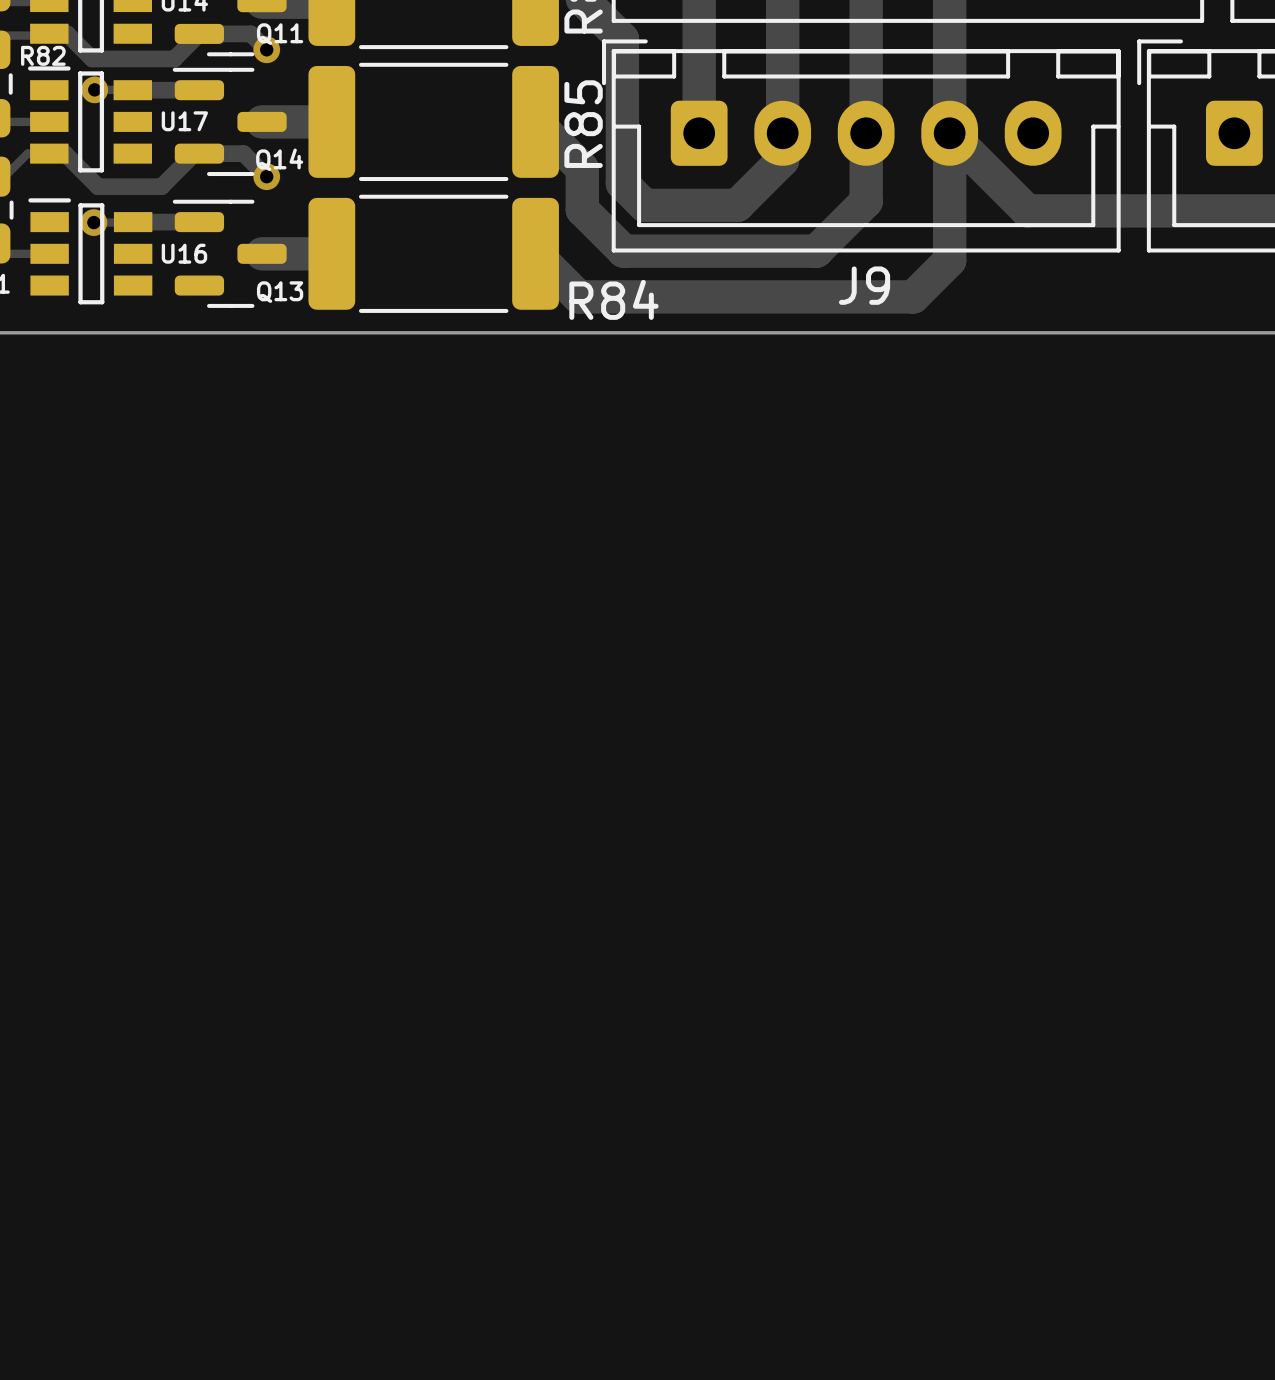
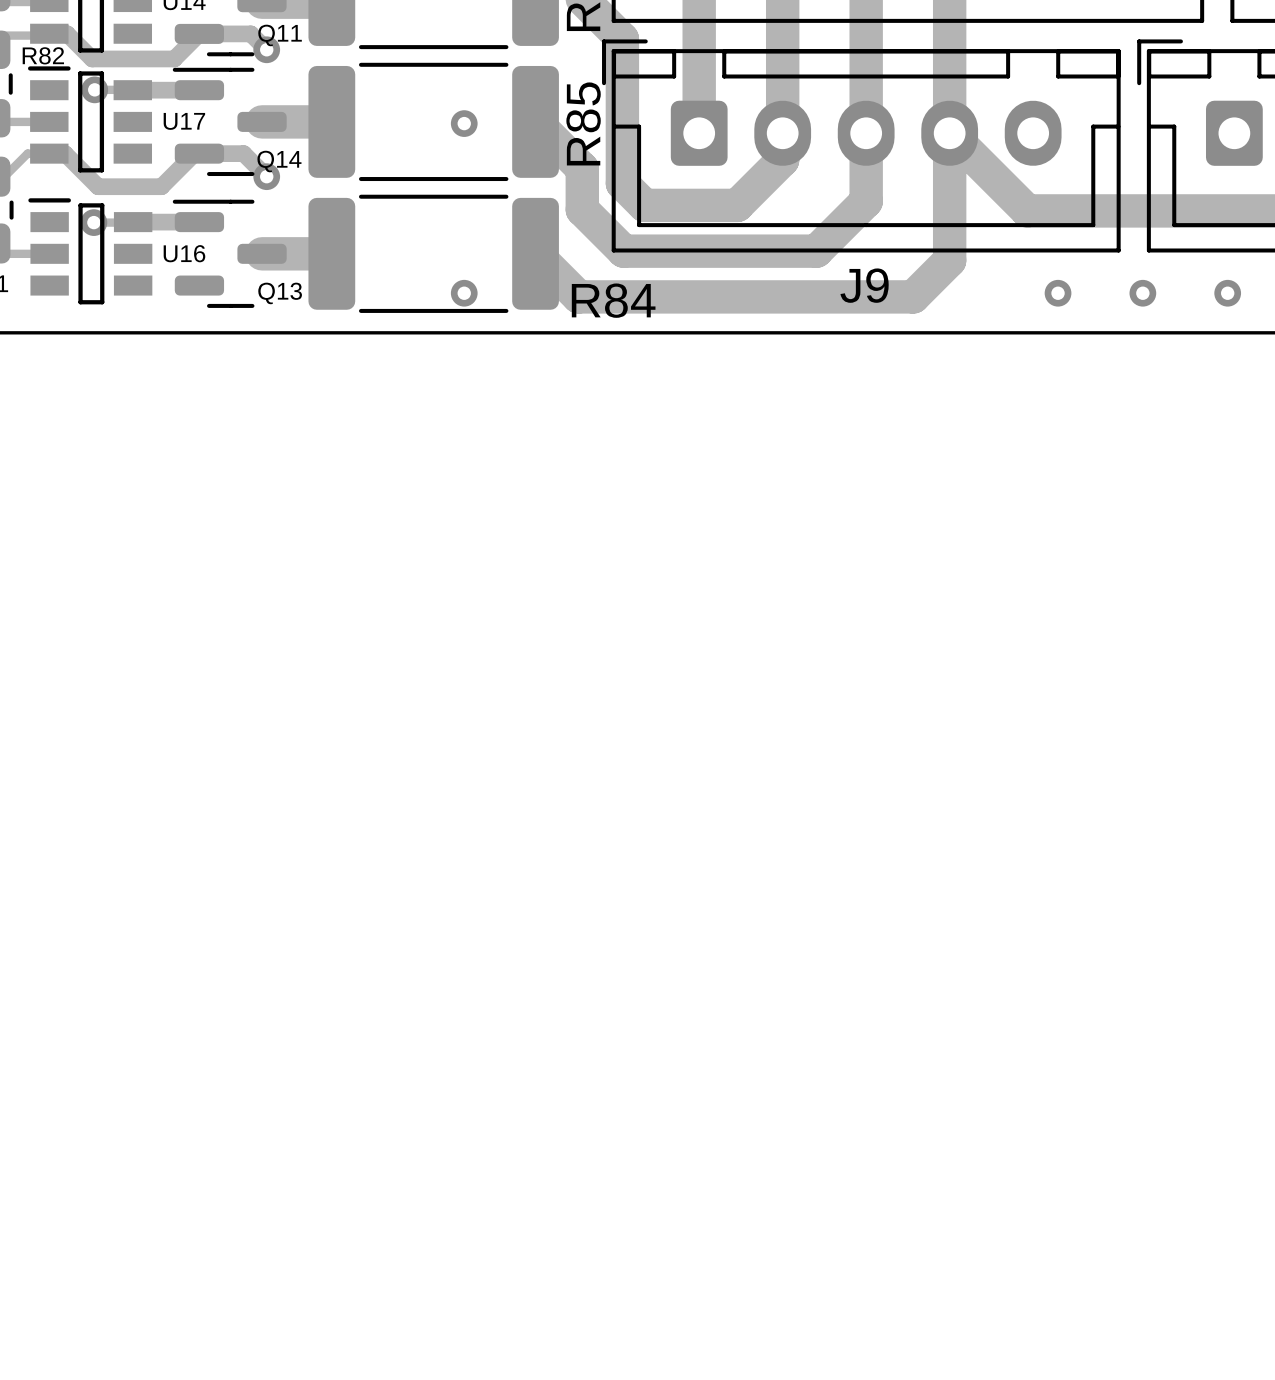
via: none -> (464, 123)
via: none -> (464, 293)
via: none -> (1058, 293)
via: none -> (1142, 293)
via: none -> (1227, 293)

